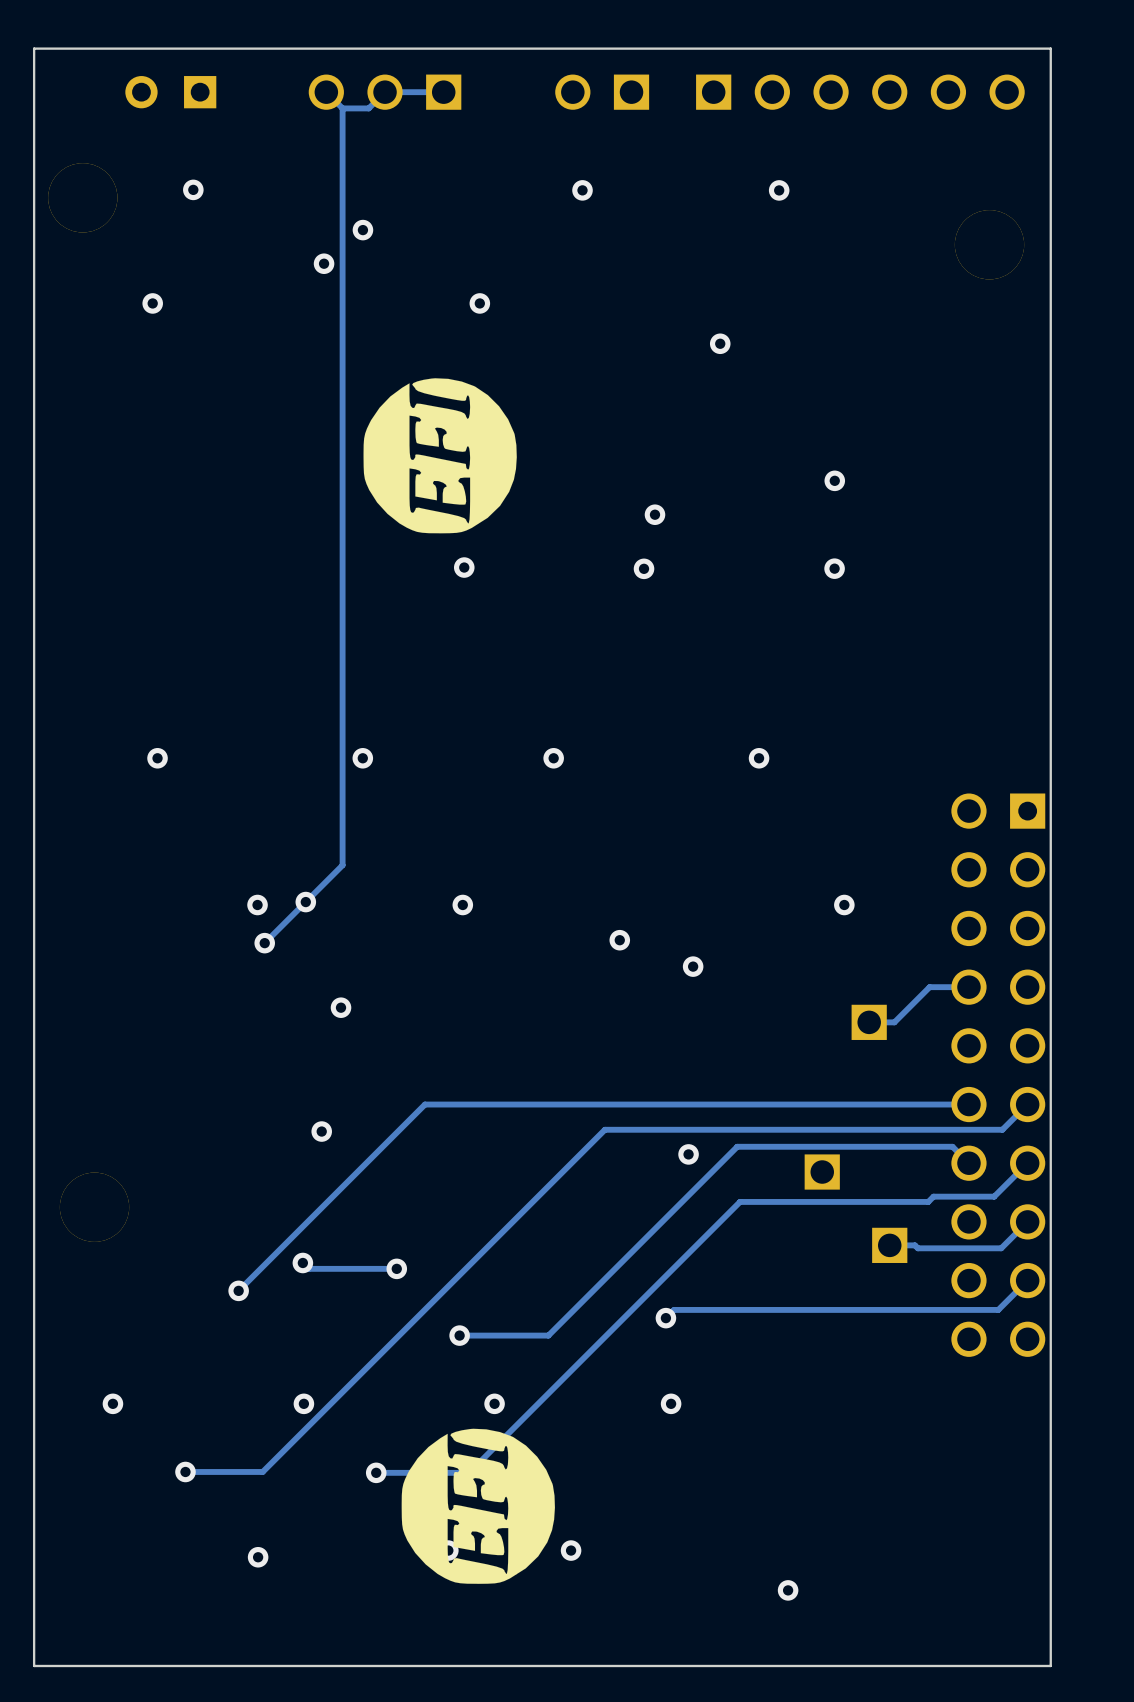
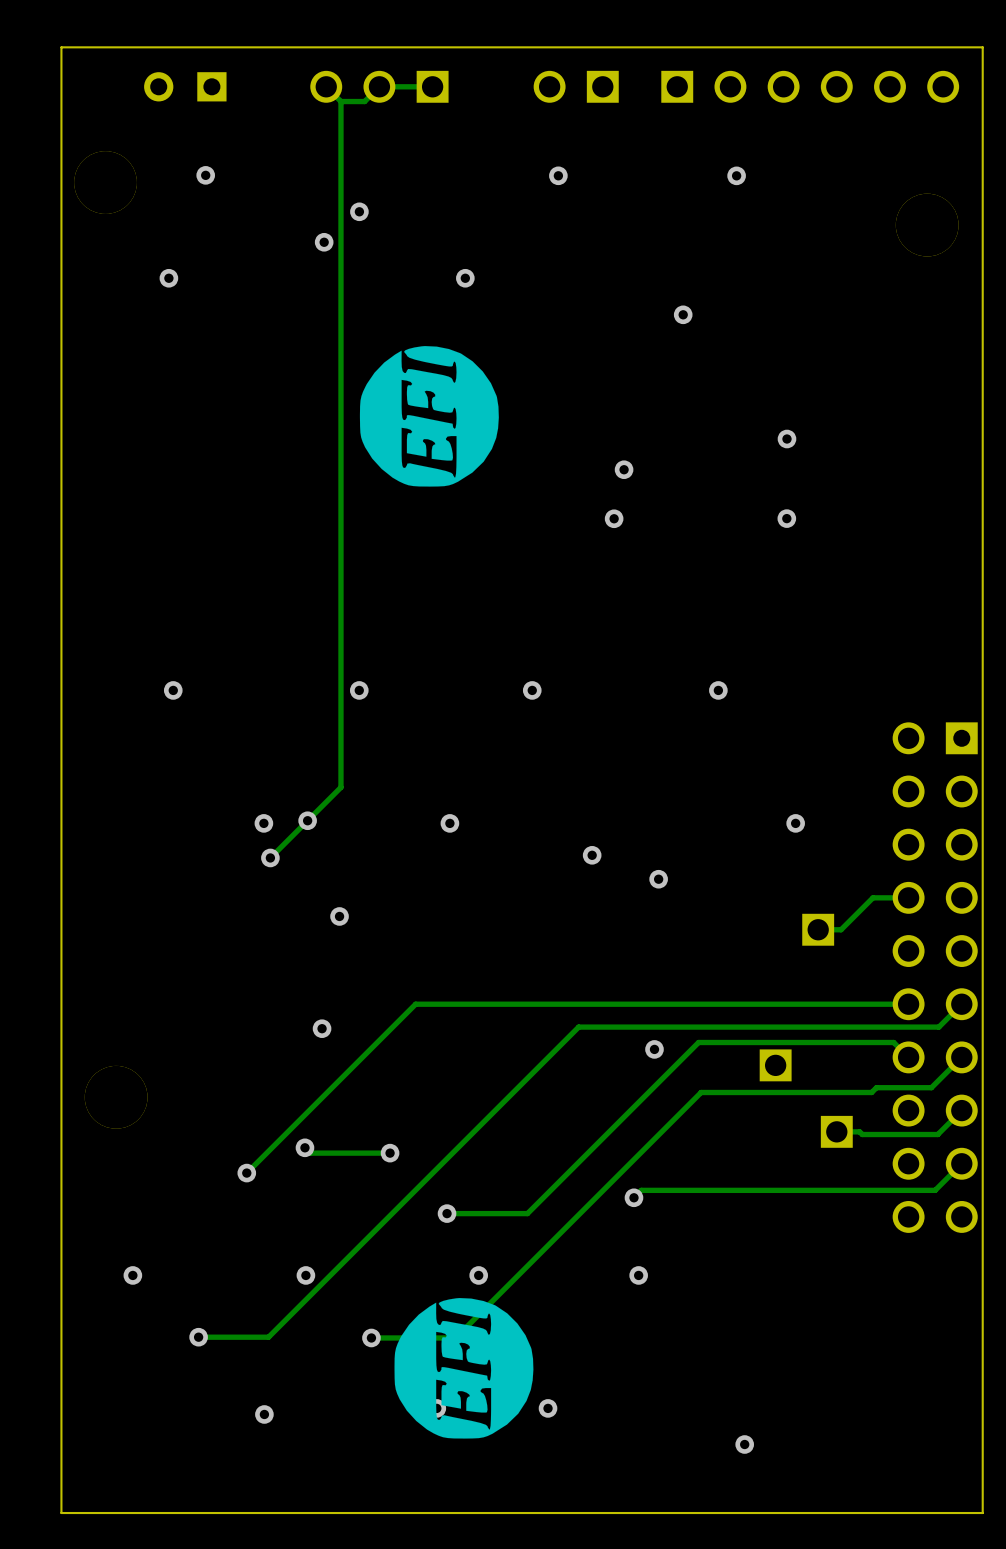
via: (464, 567) -> none

